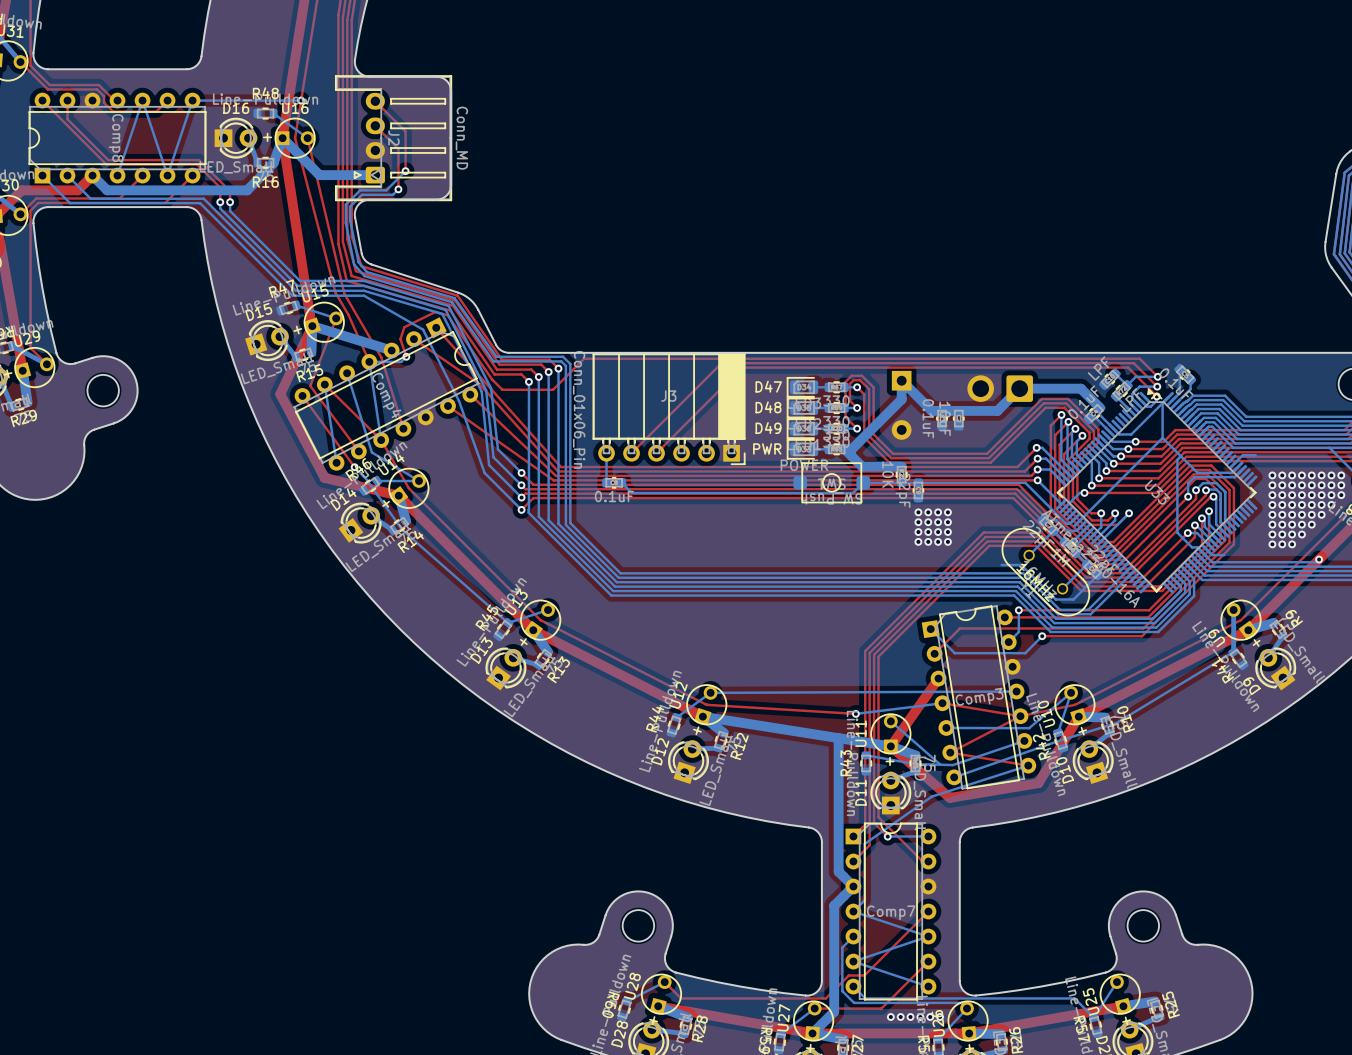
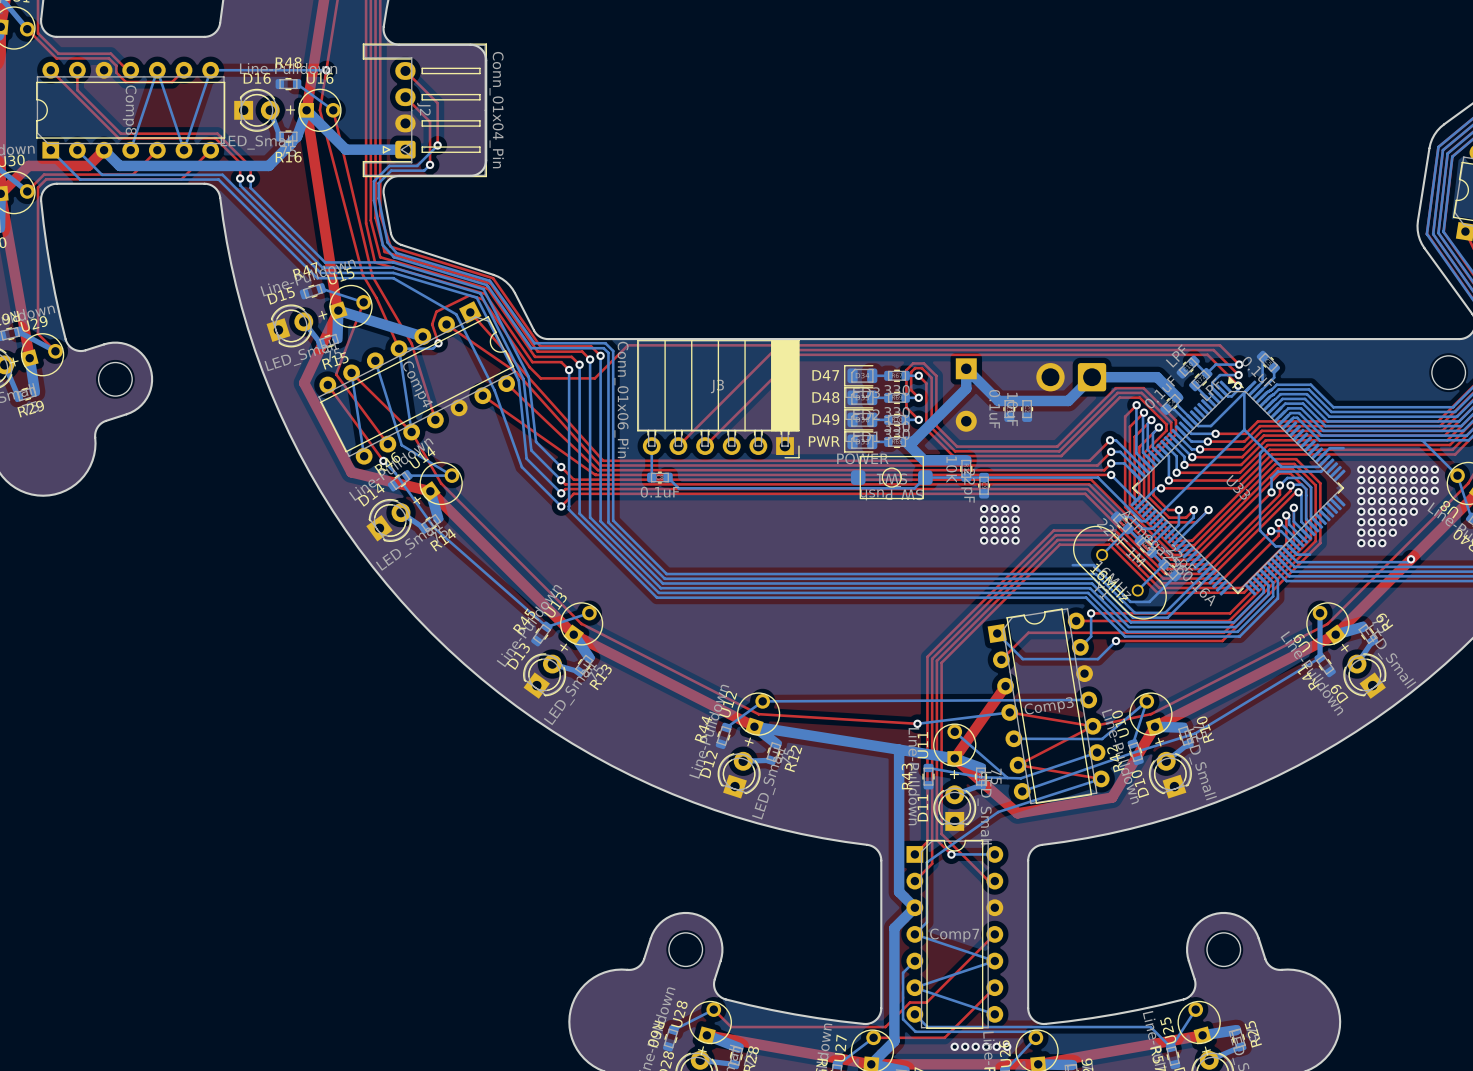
J2 value: Conn_MD (461, 138) -> Conn_01x04_Pin (496, 110)

